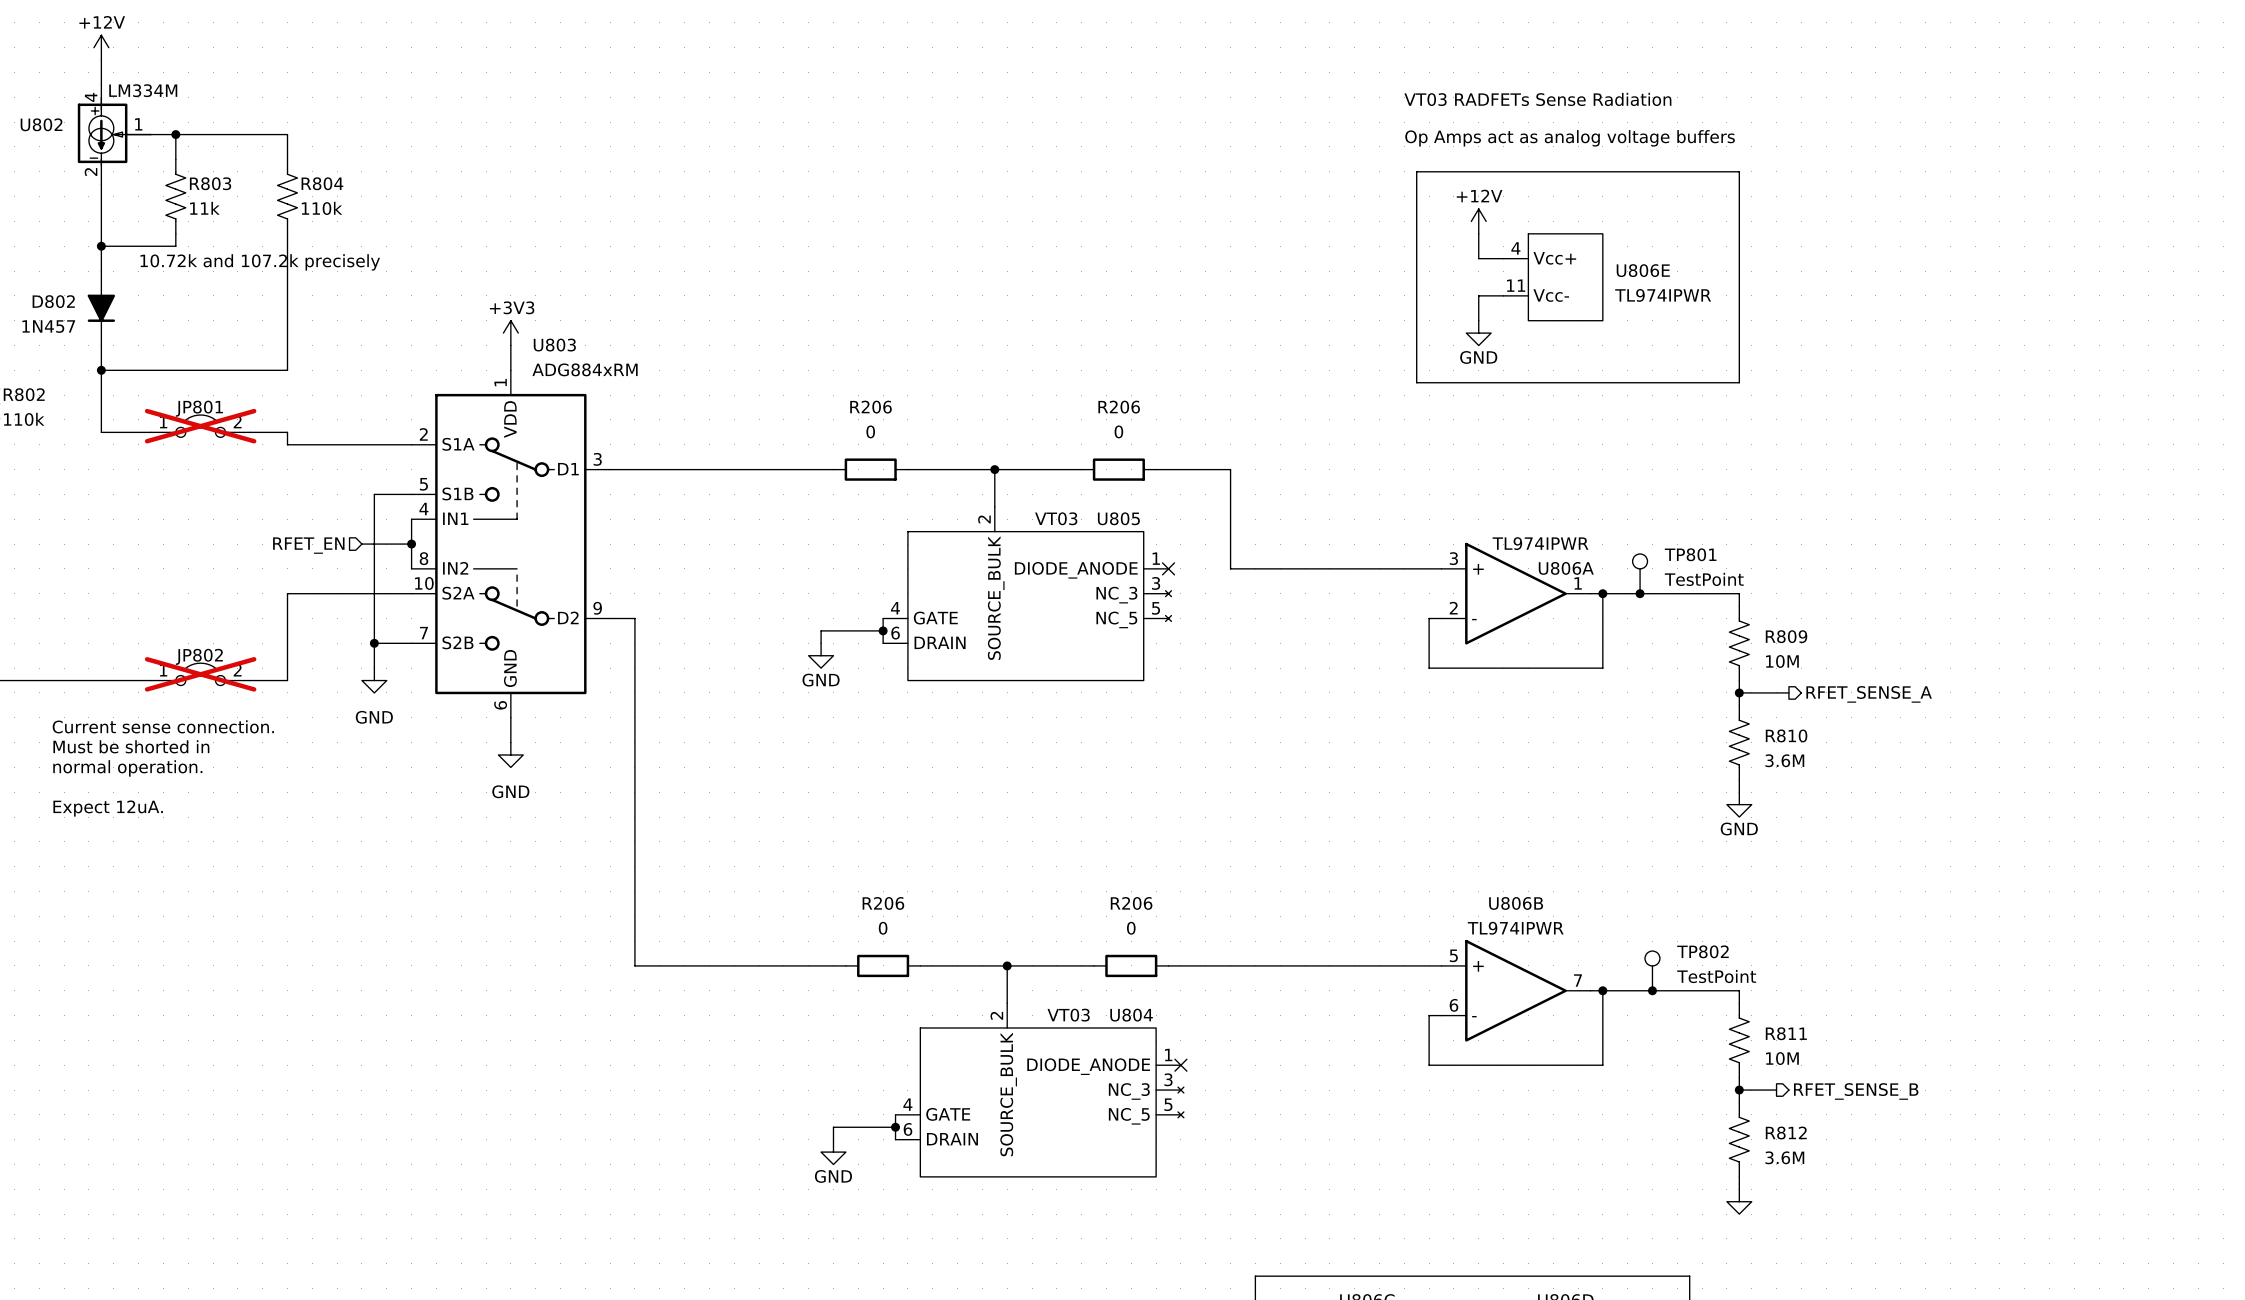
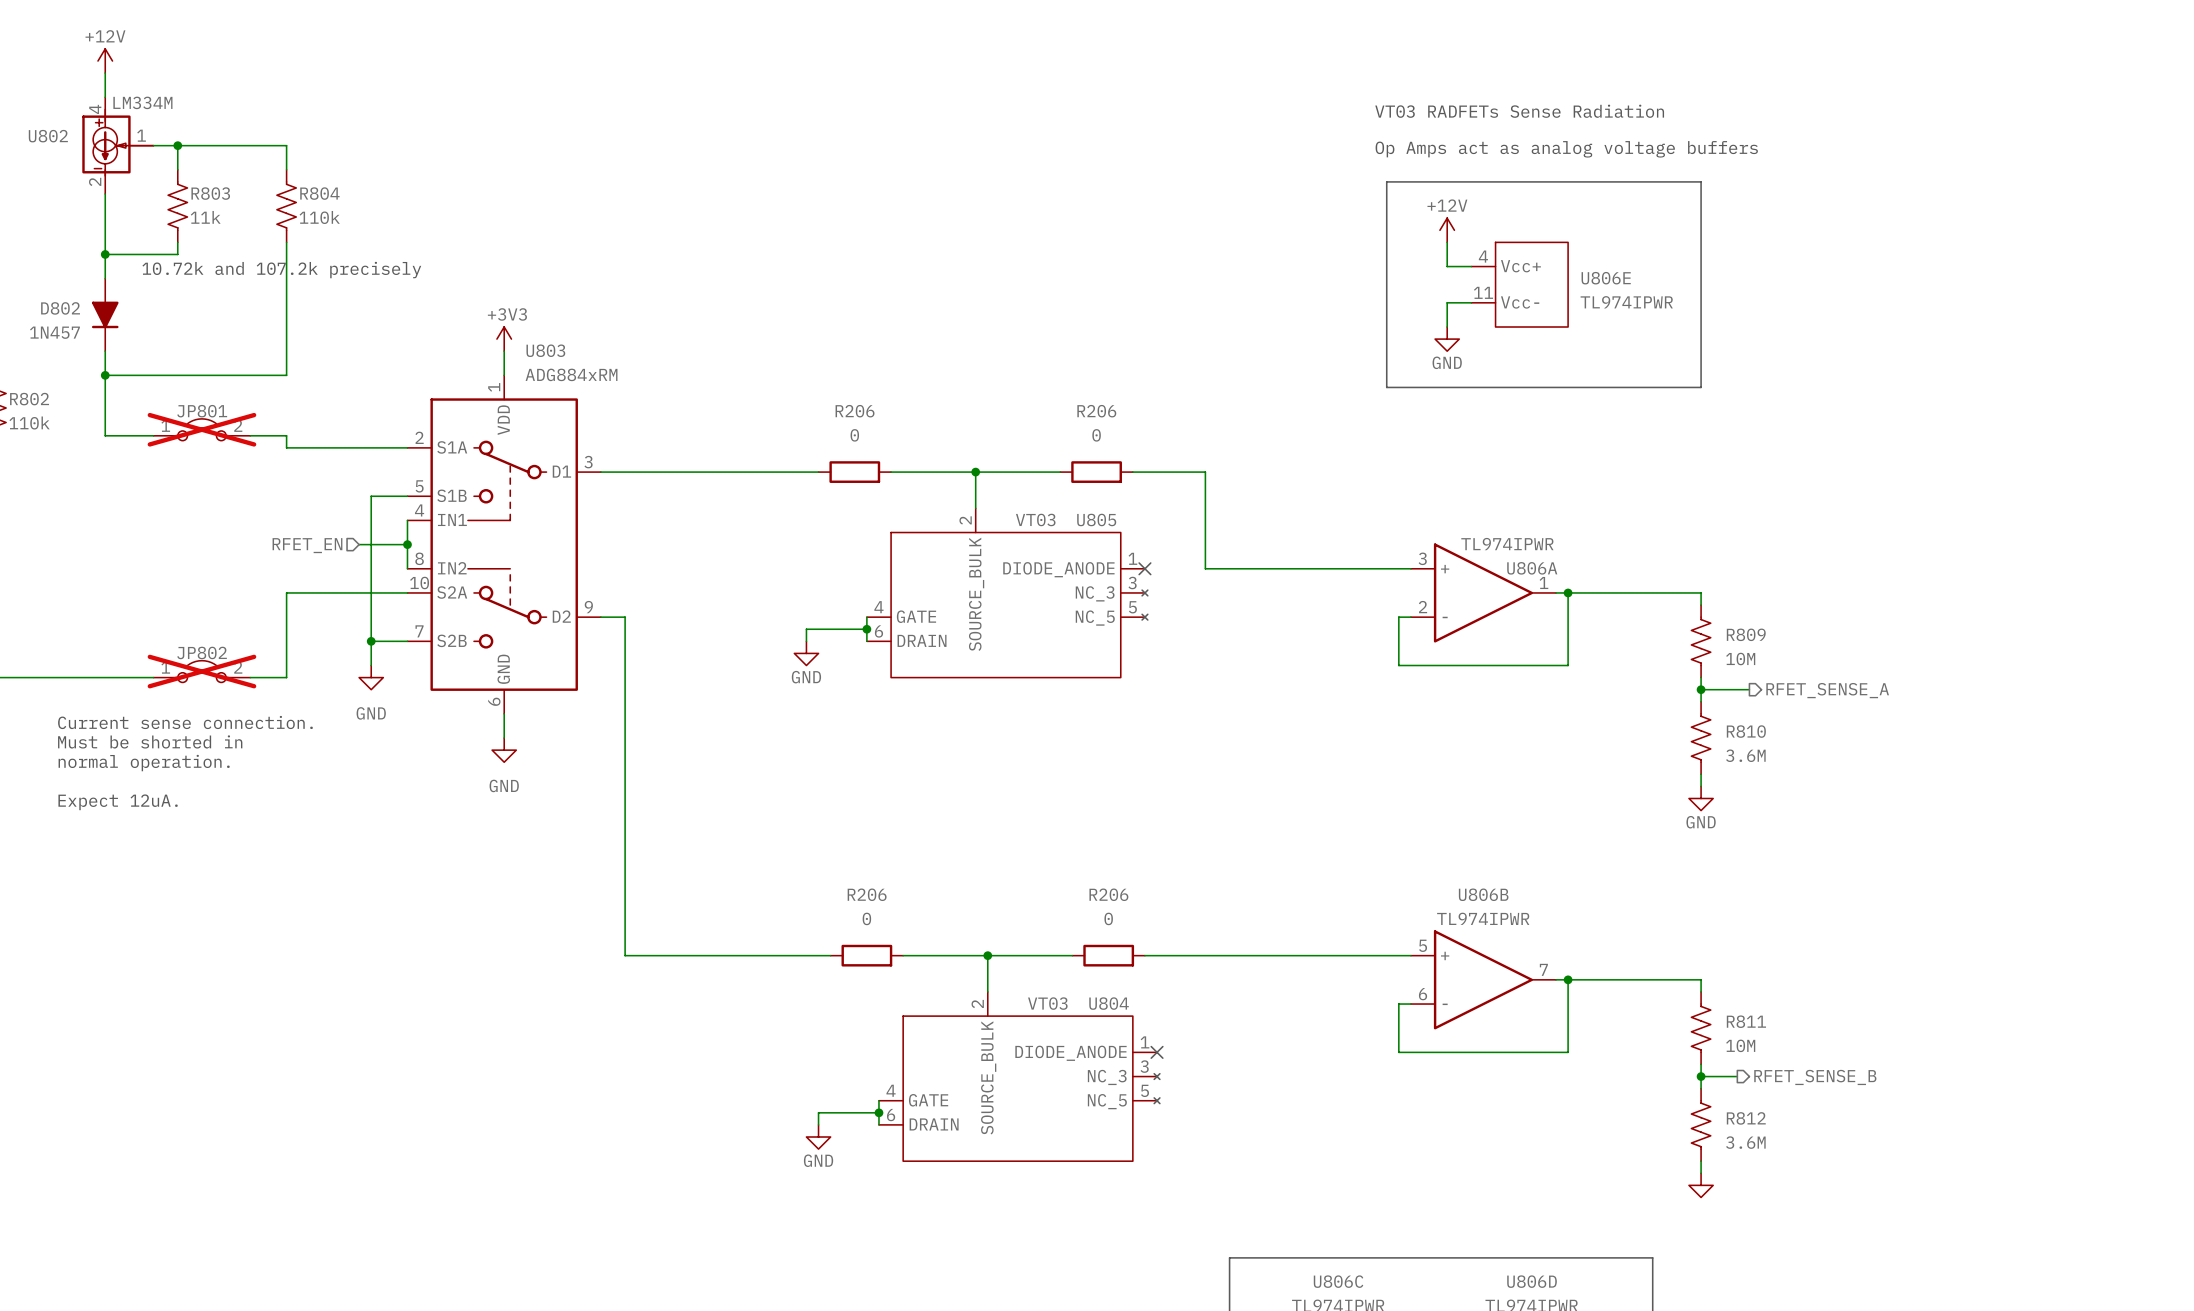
TP801: TestPoint (1640, 573) -> none
junction: (1640, 593) -> none
TP802: TestPoint (1652, 970) -> none
junction: (1652, 990) -> none

